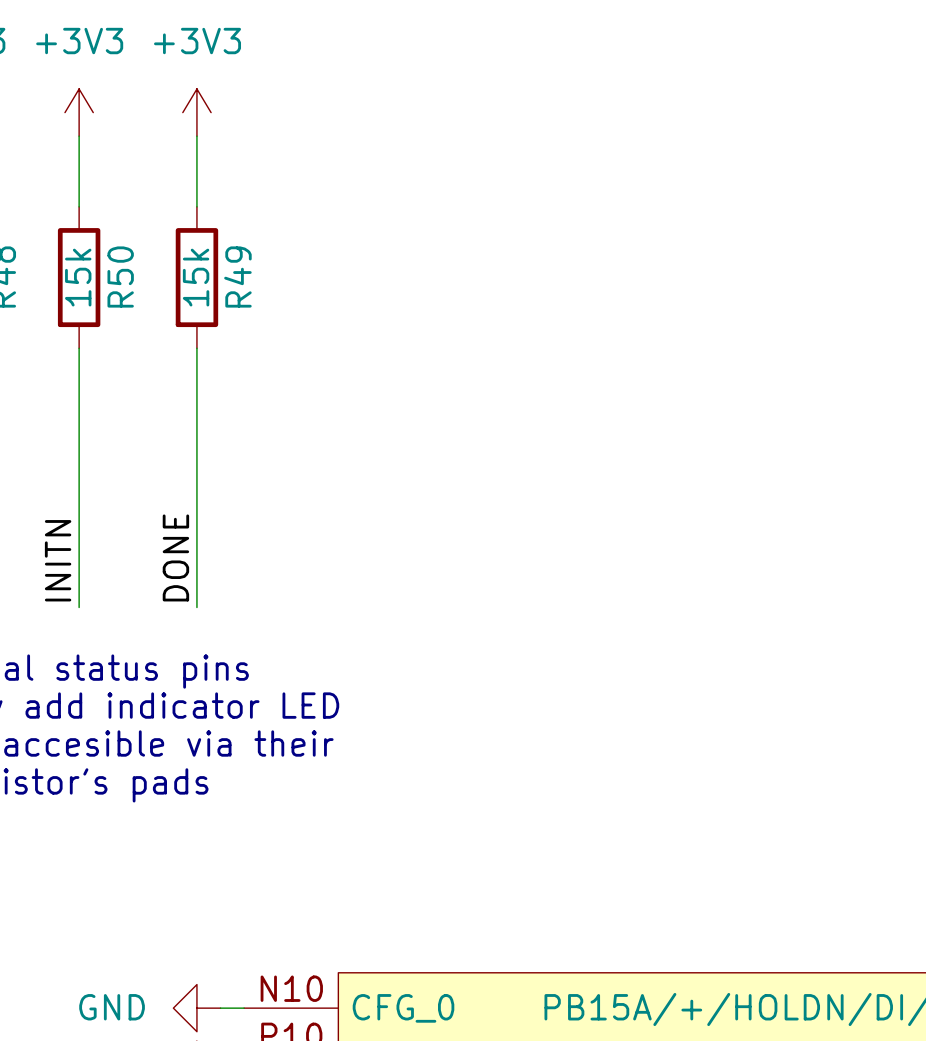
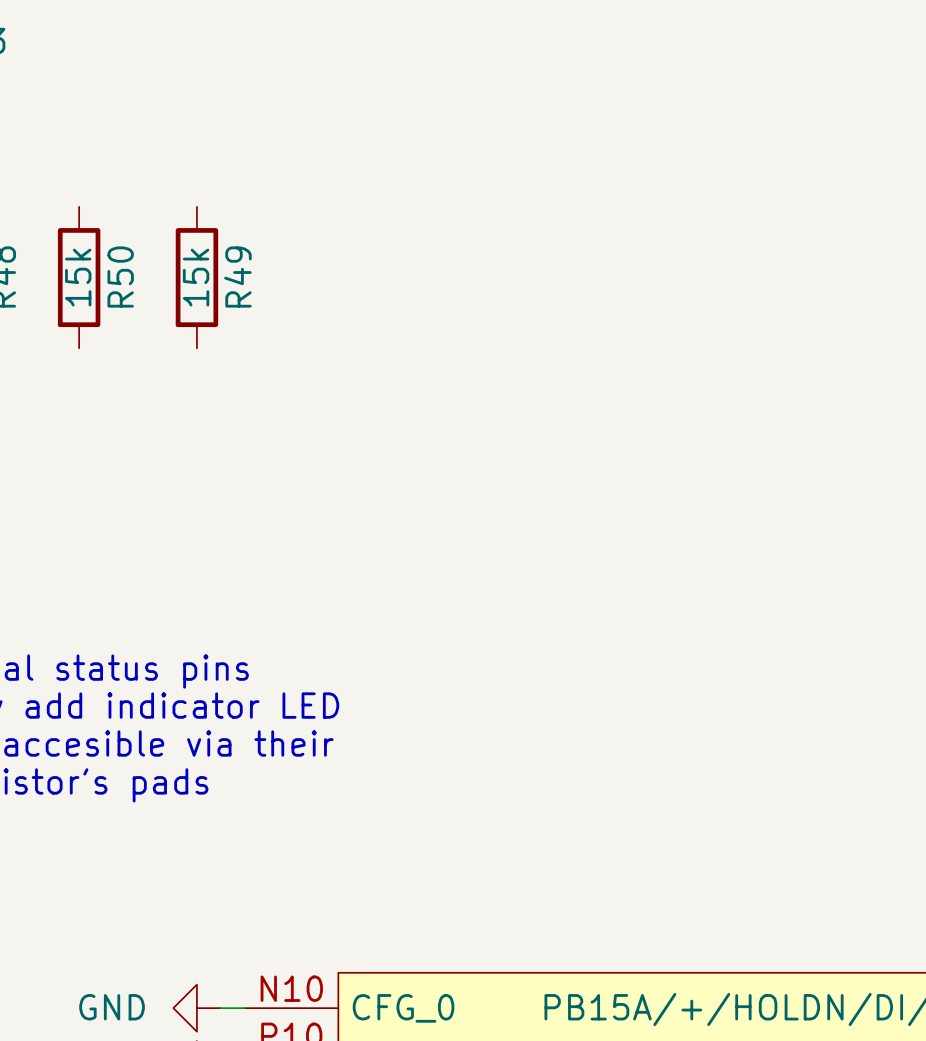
power symbol: +3V3 (79, 112) -> none
power symbol: +3V3 (196, 112) -> none
wire: (79, 136) (79, 206) -> none
wire: (196, 136) (196, 206) -> none
wire: (79, 348) (79, 607) -> none
wire: (196, 348) (196, 607) -> none
label: DONE (175, 557) -> none
label: INITN (58, 560) -> none

